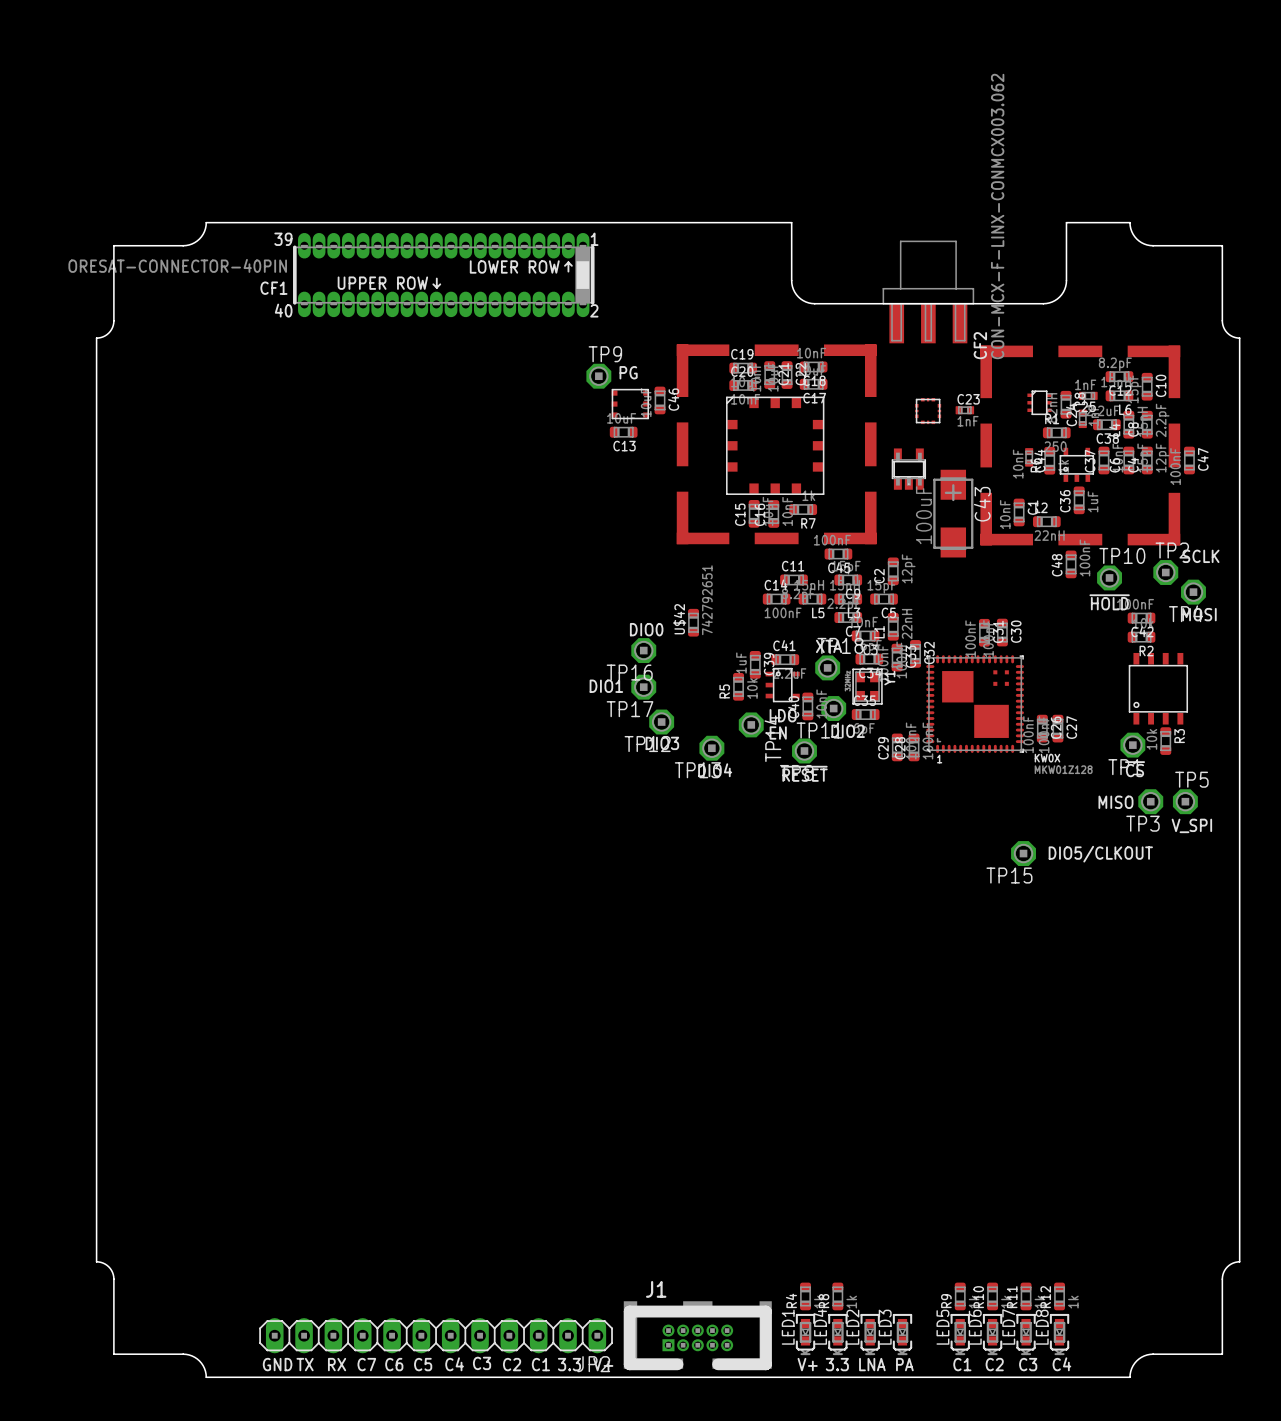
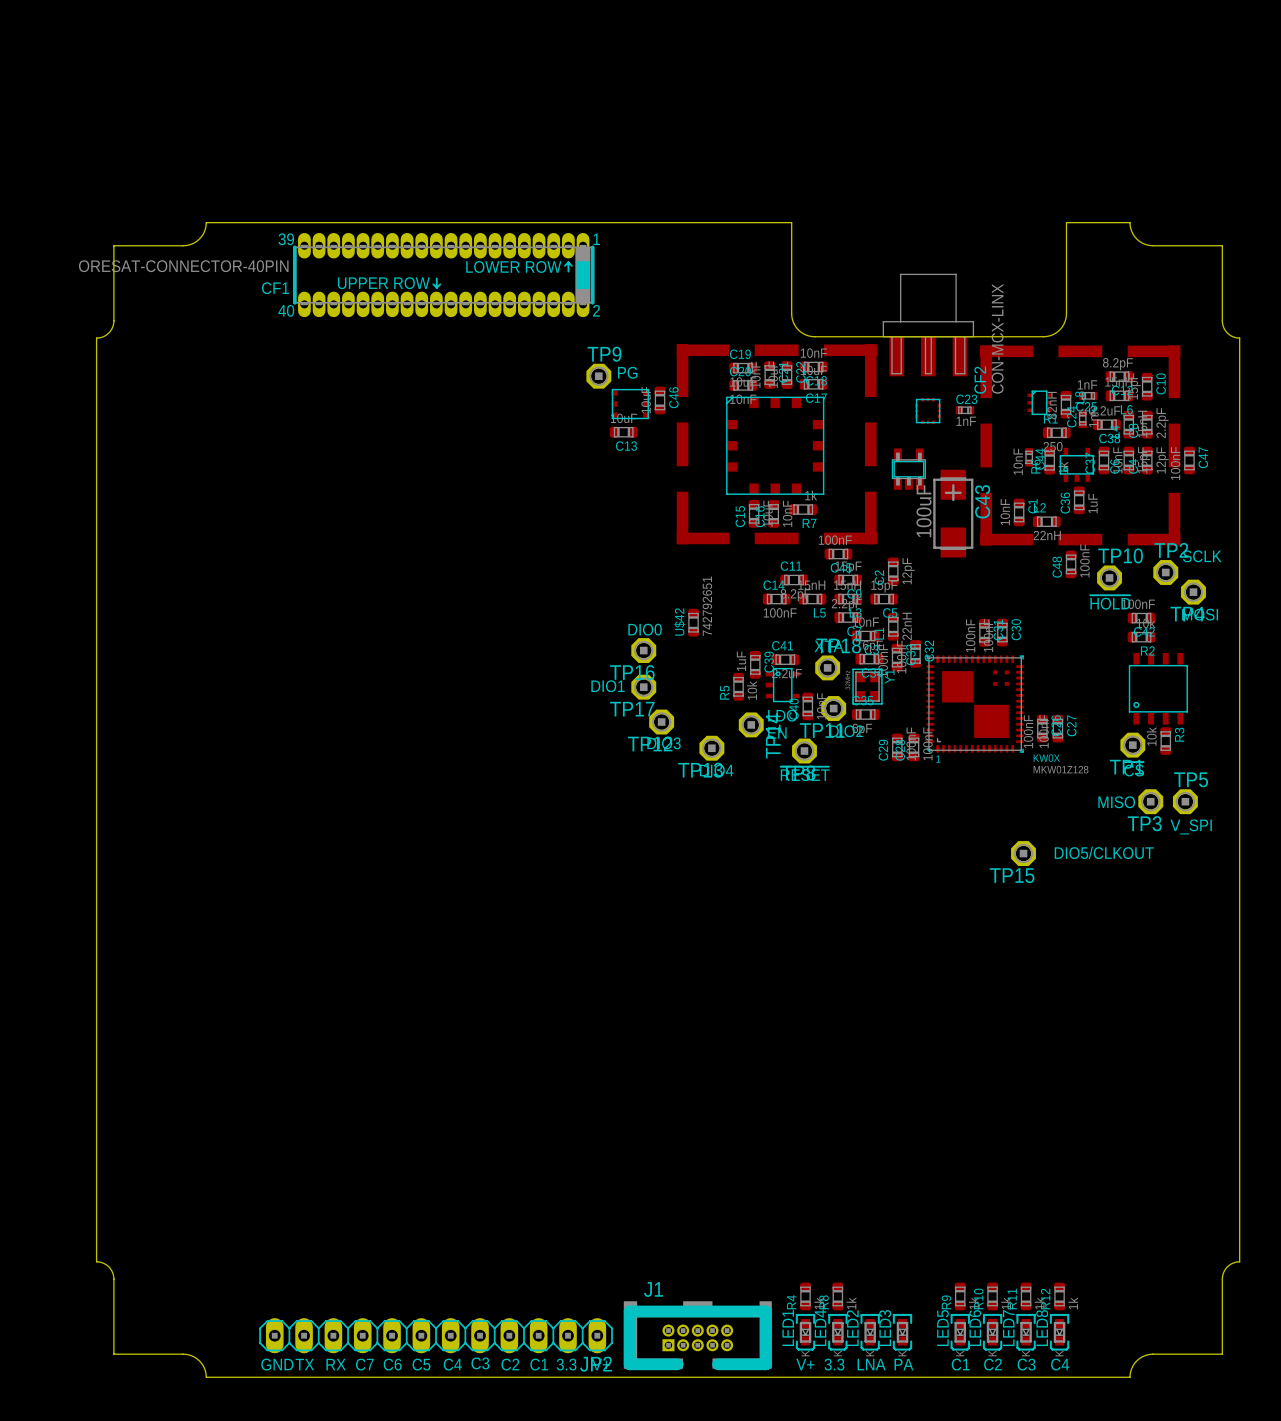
CF2 value: CON-MCX-F-LINX-CONMCX003.062 (997, 216) -> CON-MCX-LINX (997, 338)
drawing shape: [96, 222, 1241, 1378] -> [96, 222, 1241, 1378]
CF2 position: (928, 292) -> (928, 325)

